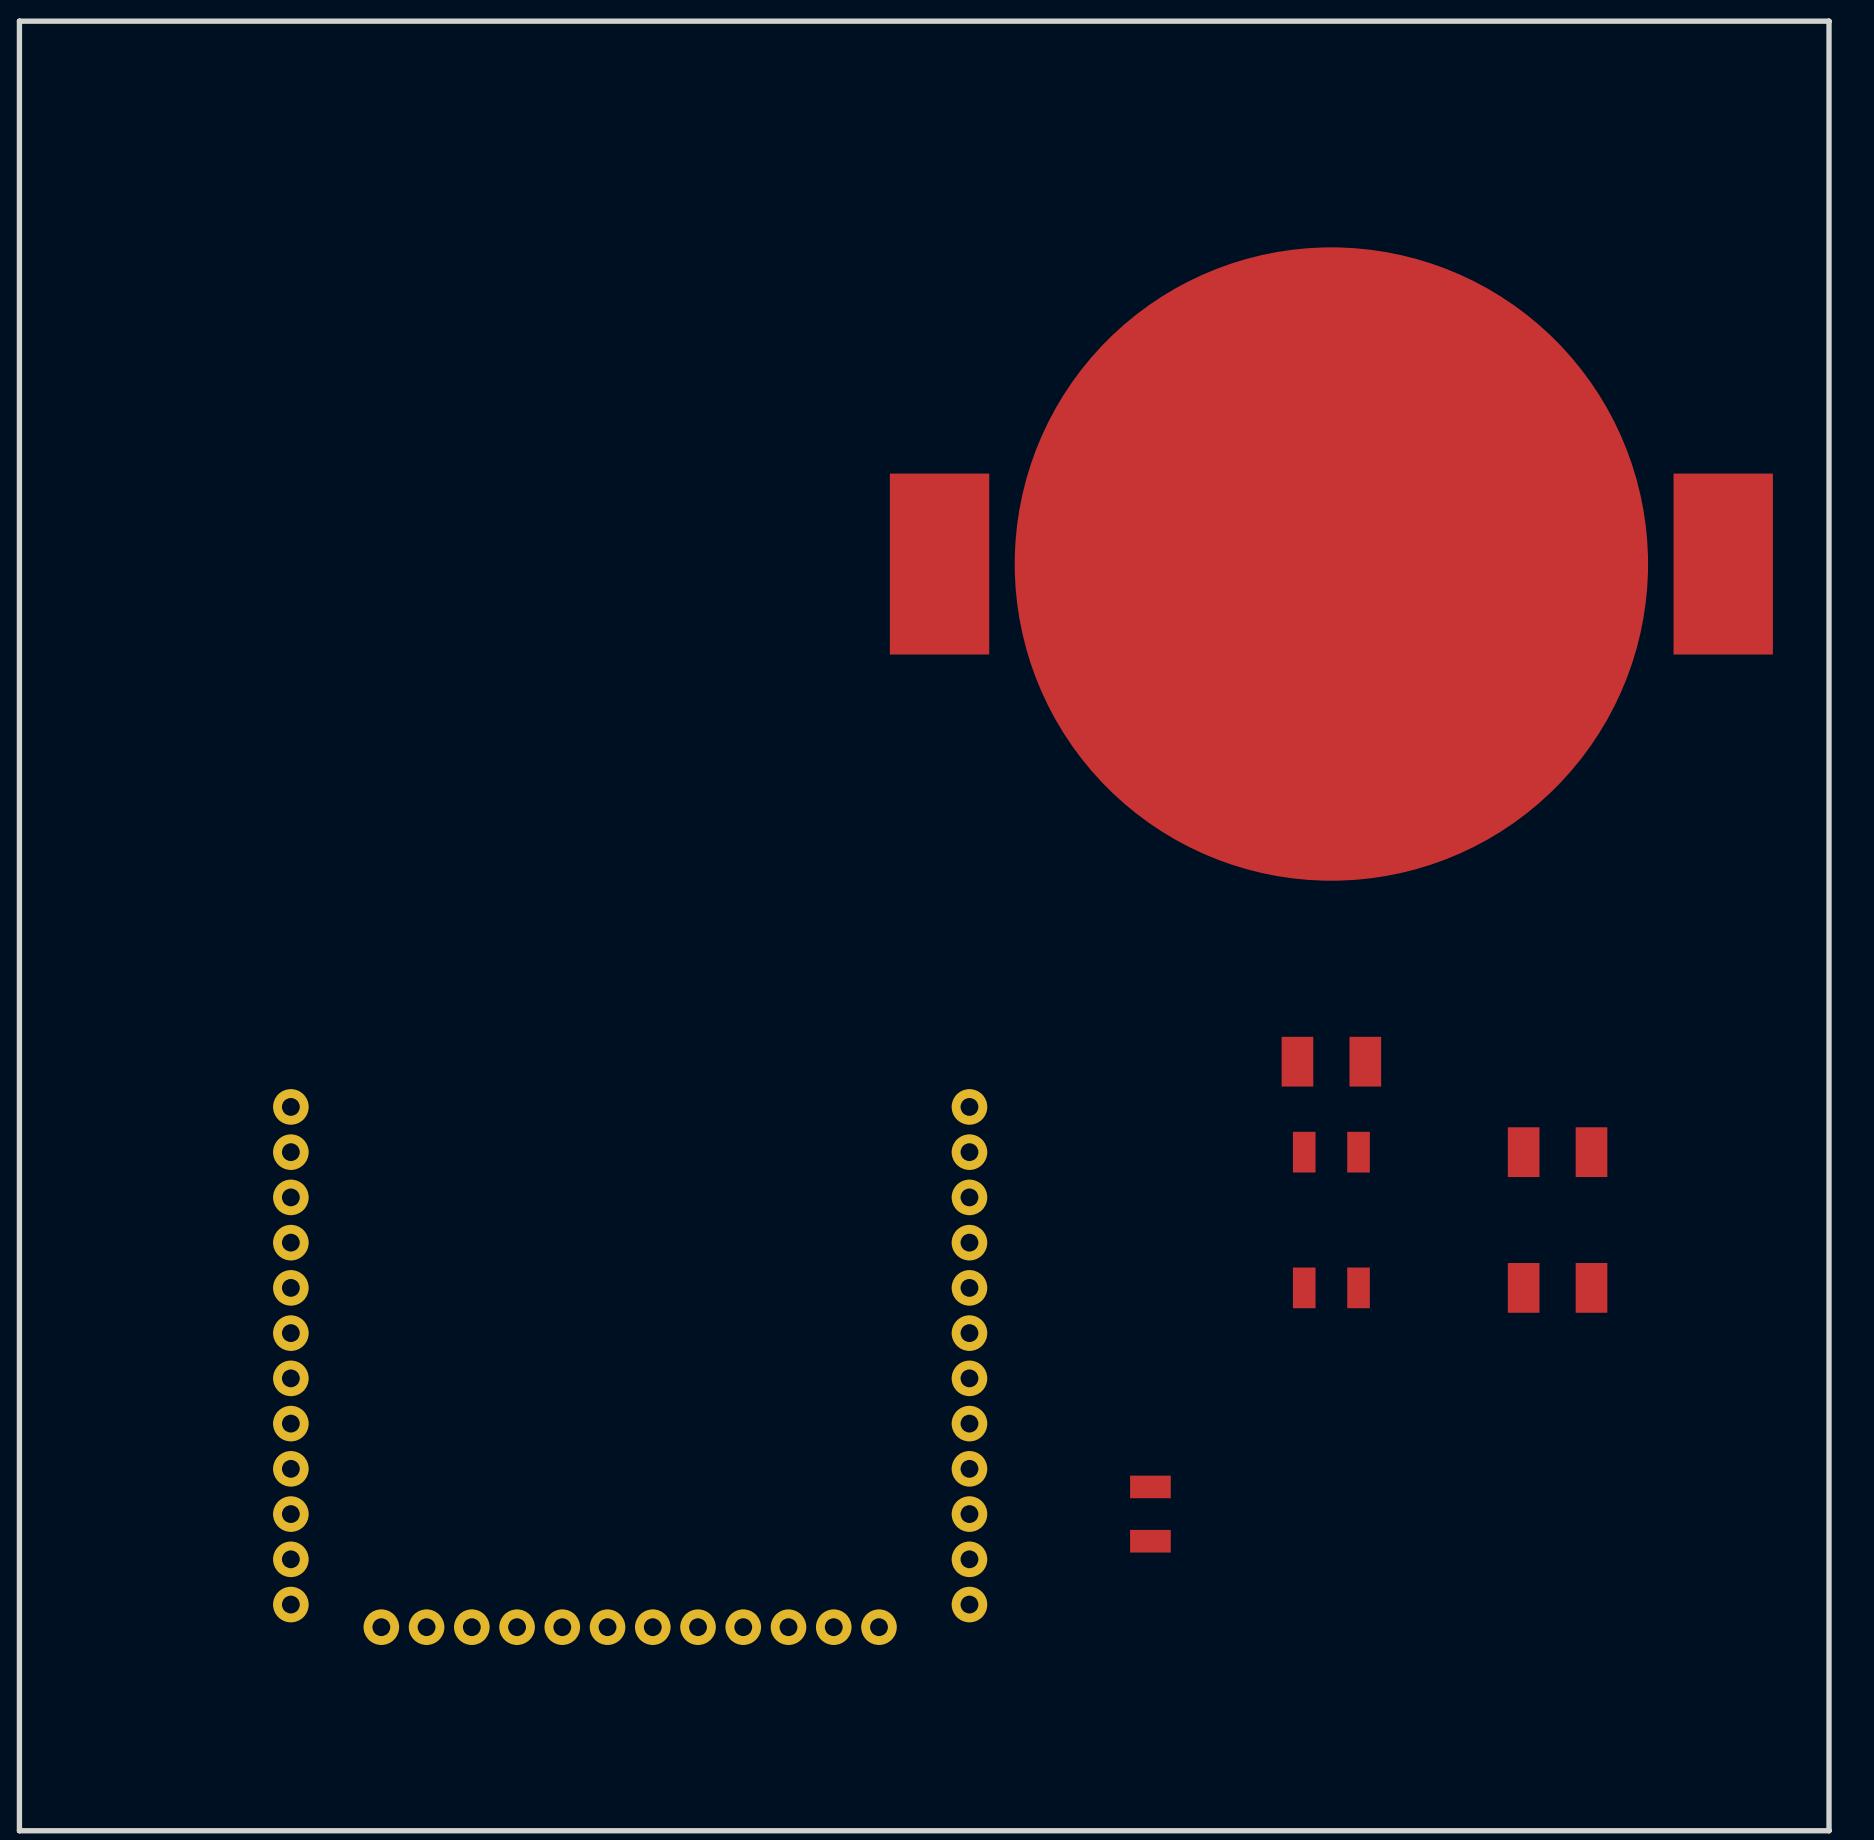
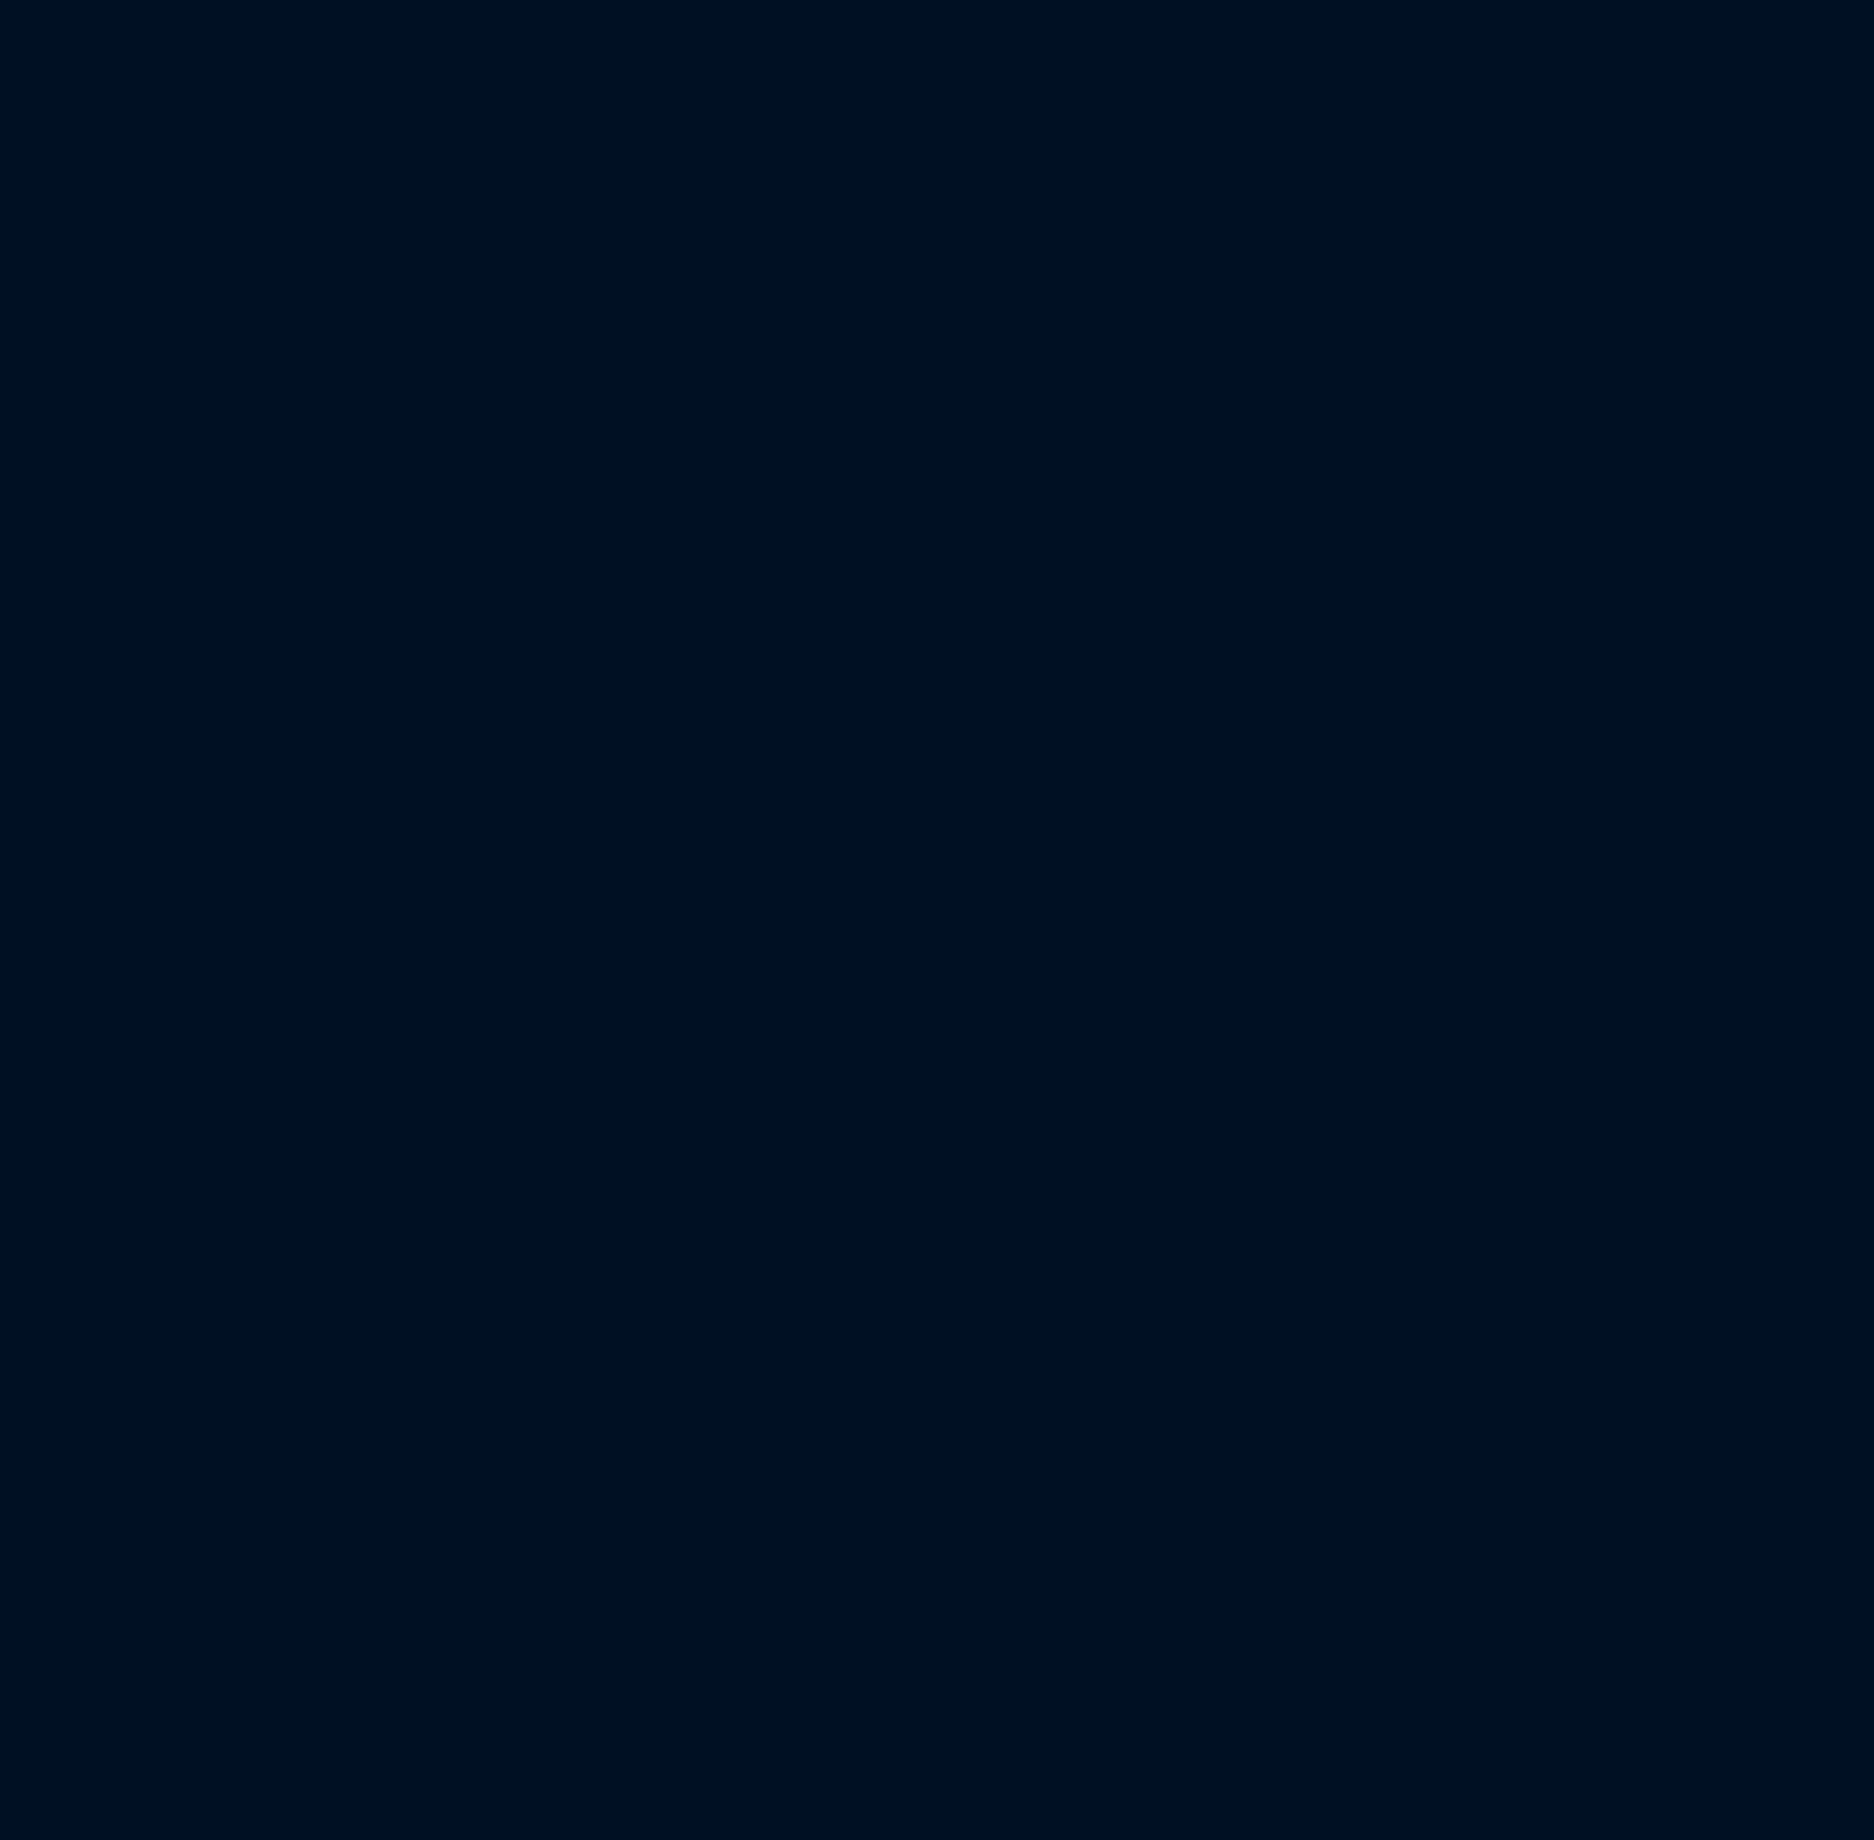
board edge: (1829, 21) (1829, 1830) (19, 1830) (19, 21) (1829, 21) -> none
part: (1331, 564) -> none
part: (1331, 1061) -> none
part: (1331, 1152) -> none
part: (1557, 1152) -> none
part: (1331, 1287) -> none
part: (1557, 1287) -> none
part: (630, 1367) -> none
part: (1150, 1514) -> none

